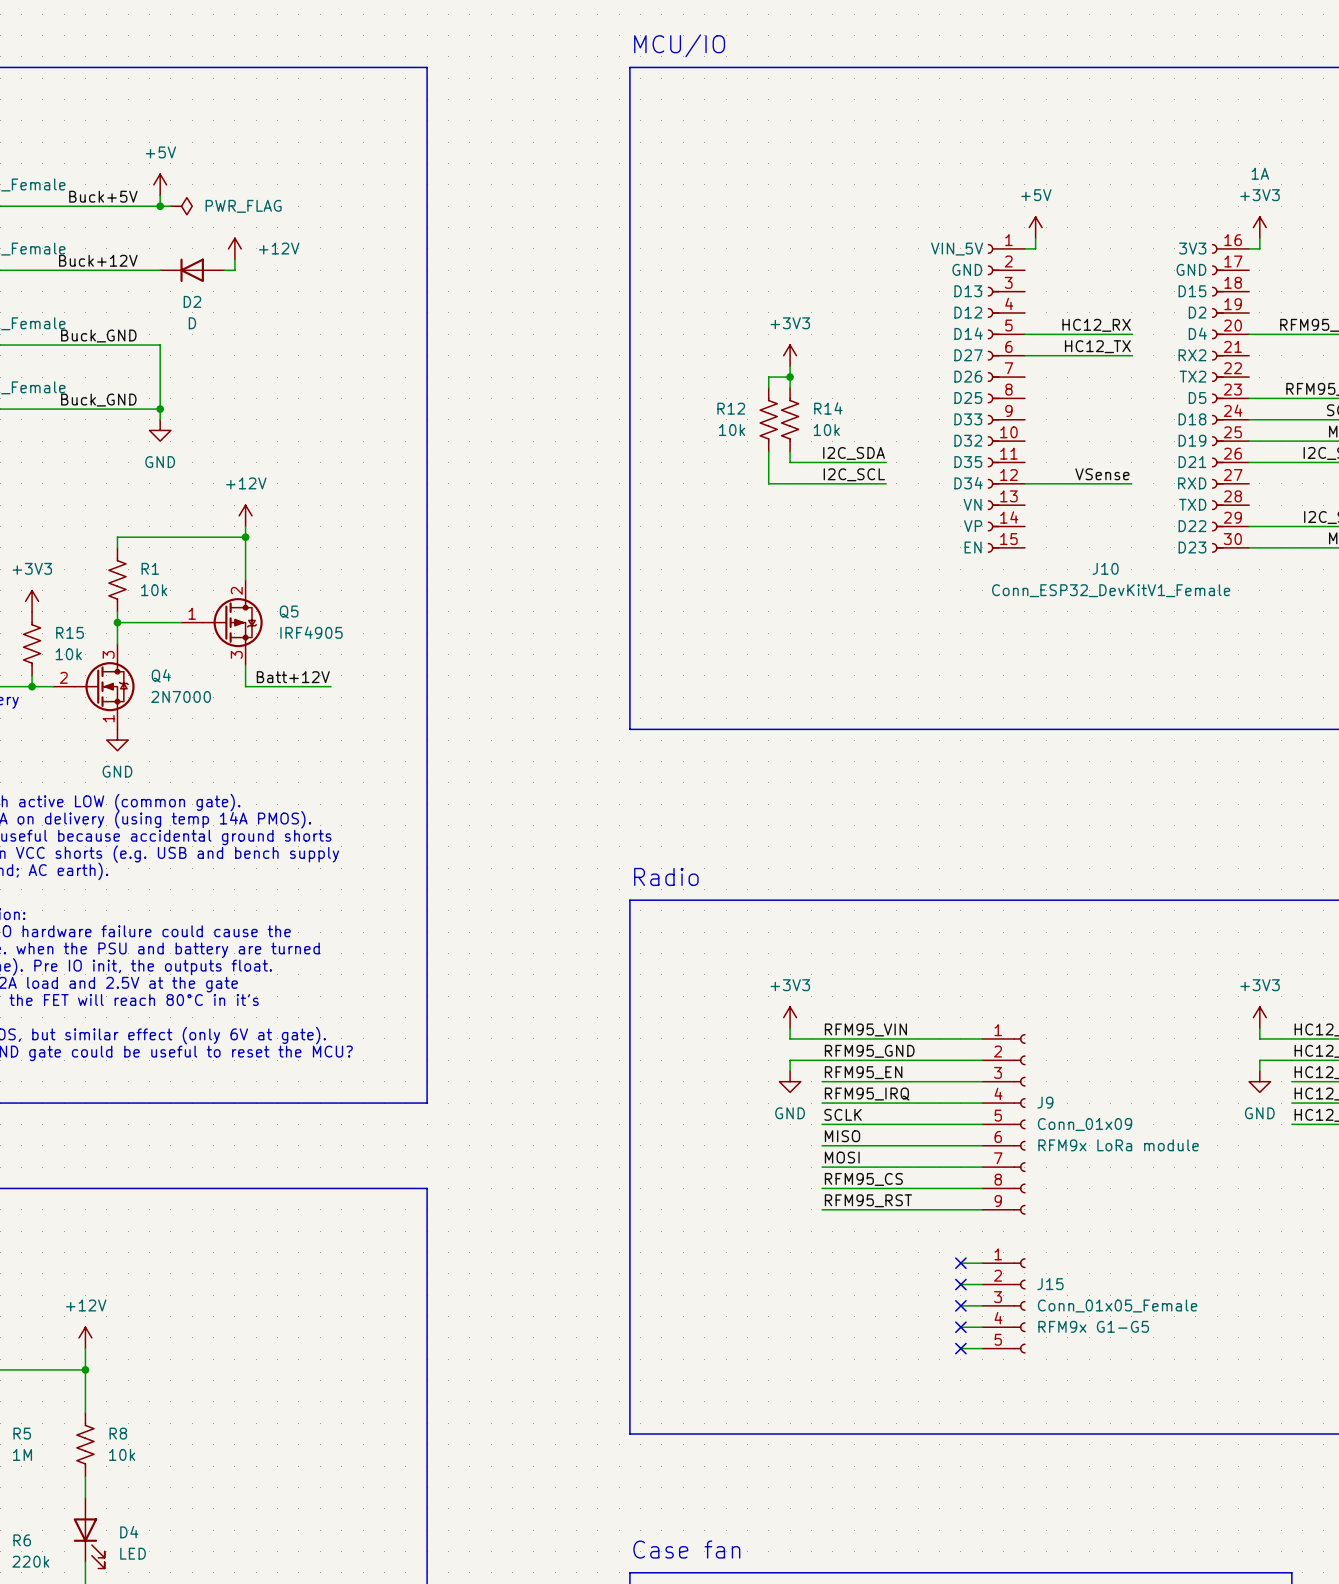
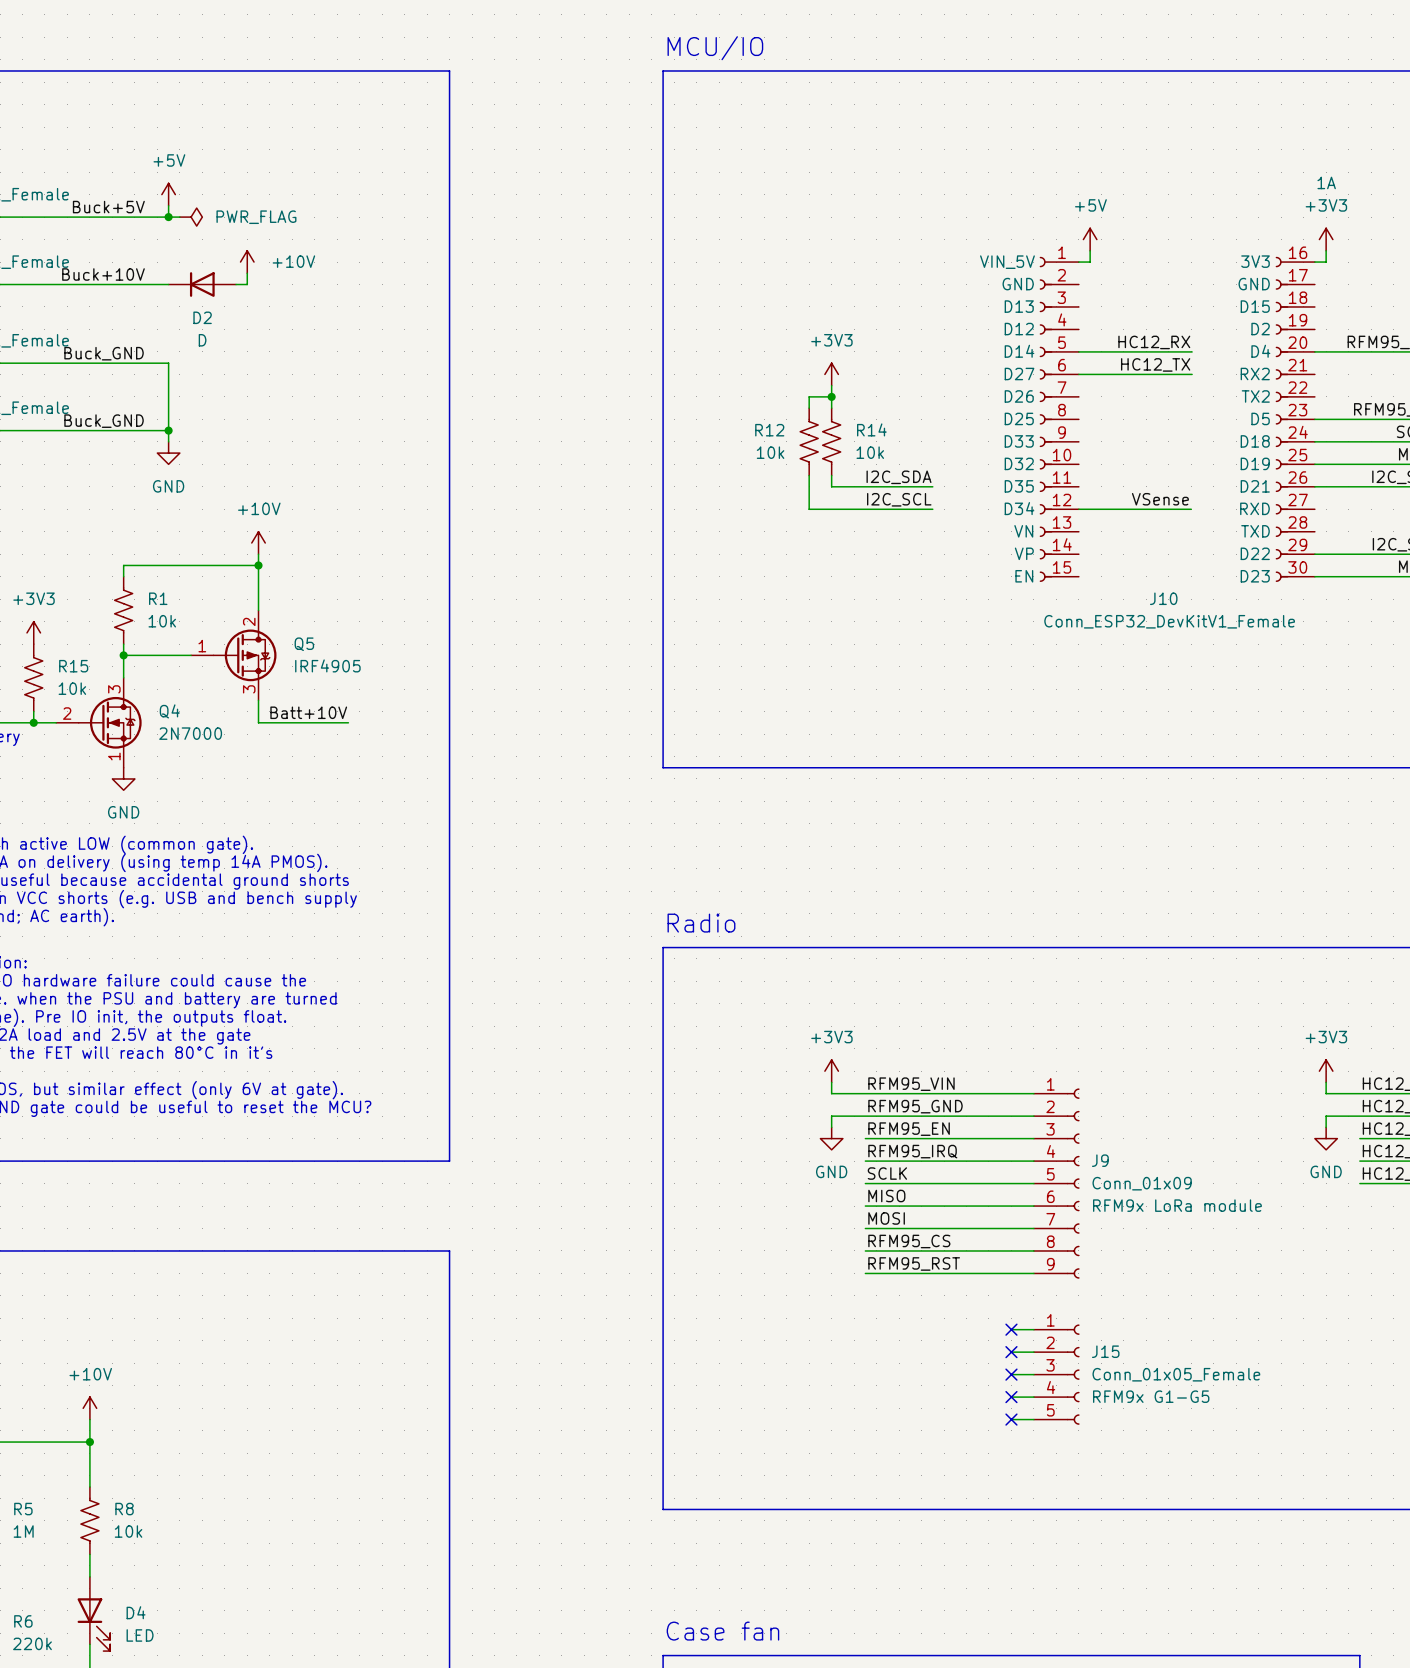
power symbol: +12V (234, 248) -> +10V (247, 262)
label: Buck+12V (98, 260) -> Buck+10V (103, 274)
power symbol: +12V (245, 515) -> +10V (258, 542)
label: Batt+12V (293, 677) -> Batt+10V (308, 712)
power symbol: +12V (85, 1337) -> +10V (89, 1408)

